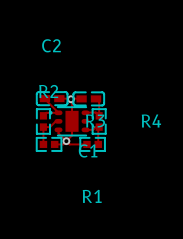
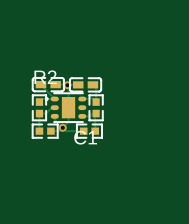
C2 name: C2 (51, 45) -> none
R4 name: R4 (151, 120) -> none
R3 name: R3 (95, 121) -> none
R1 name: R1 (92, 196) -> none

